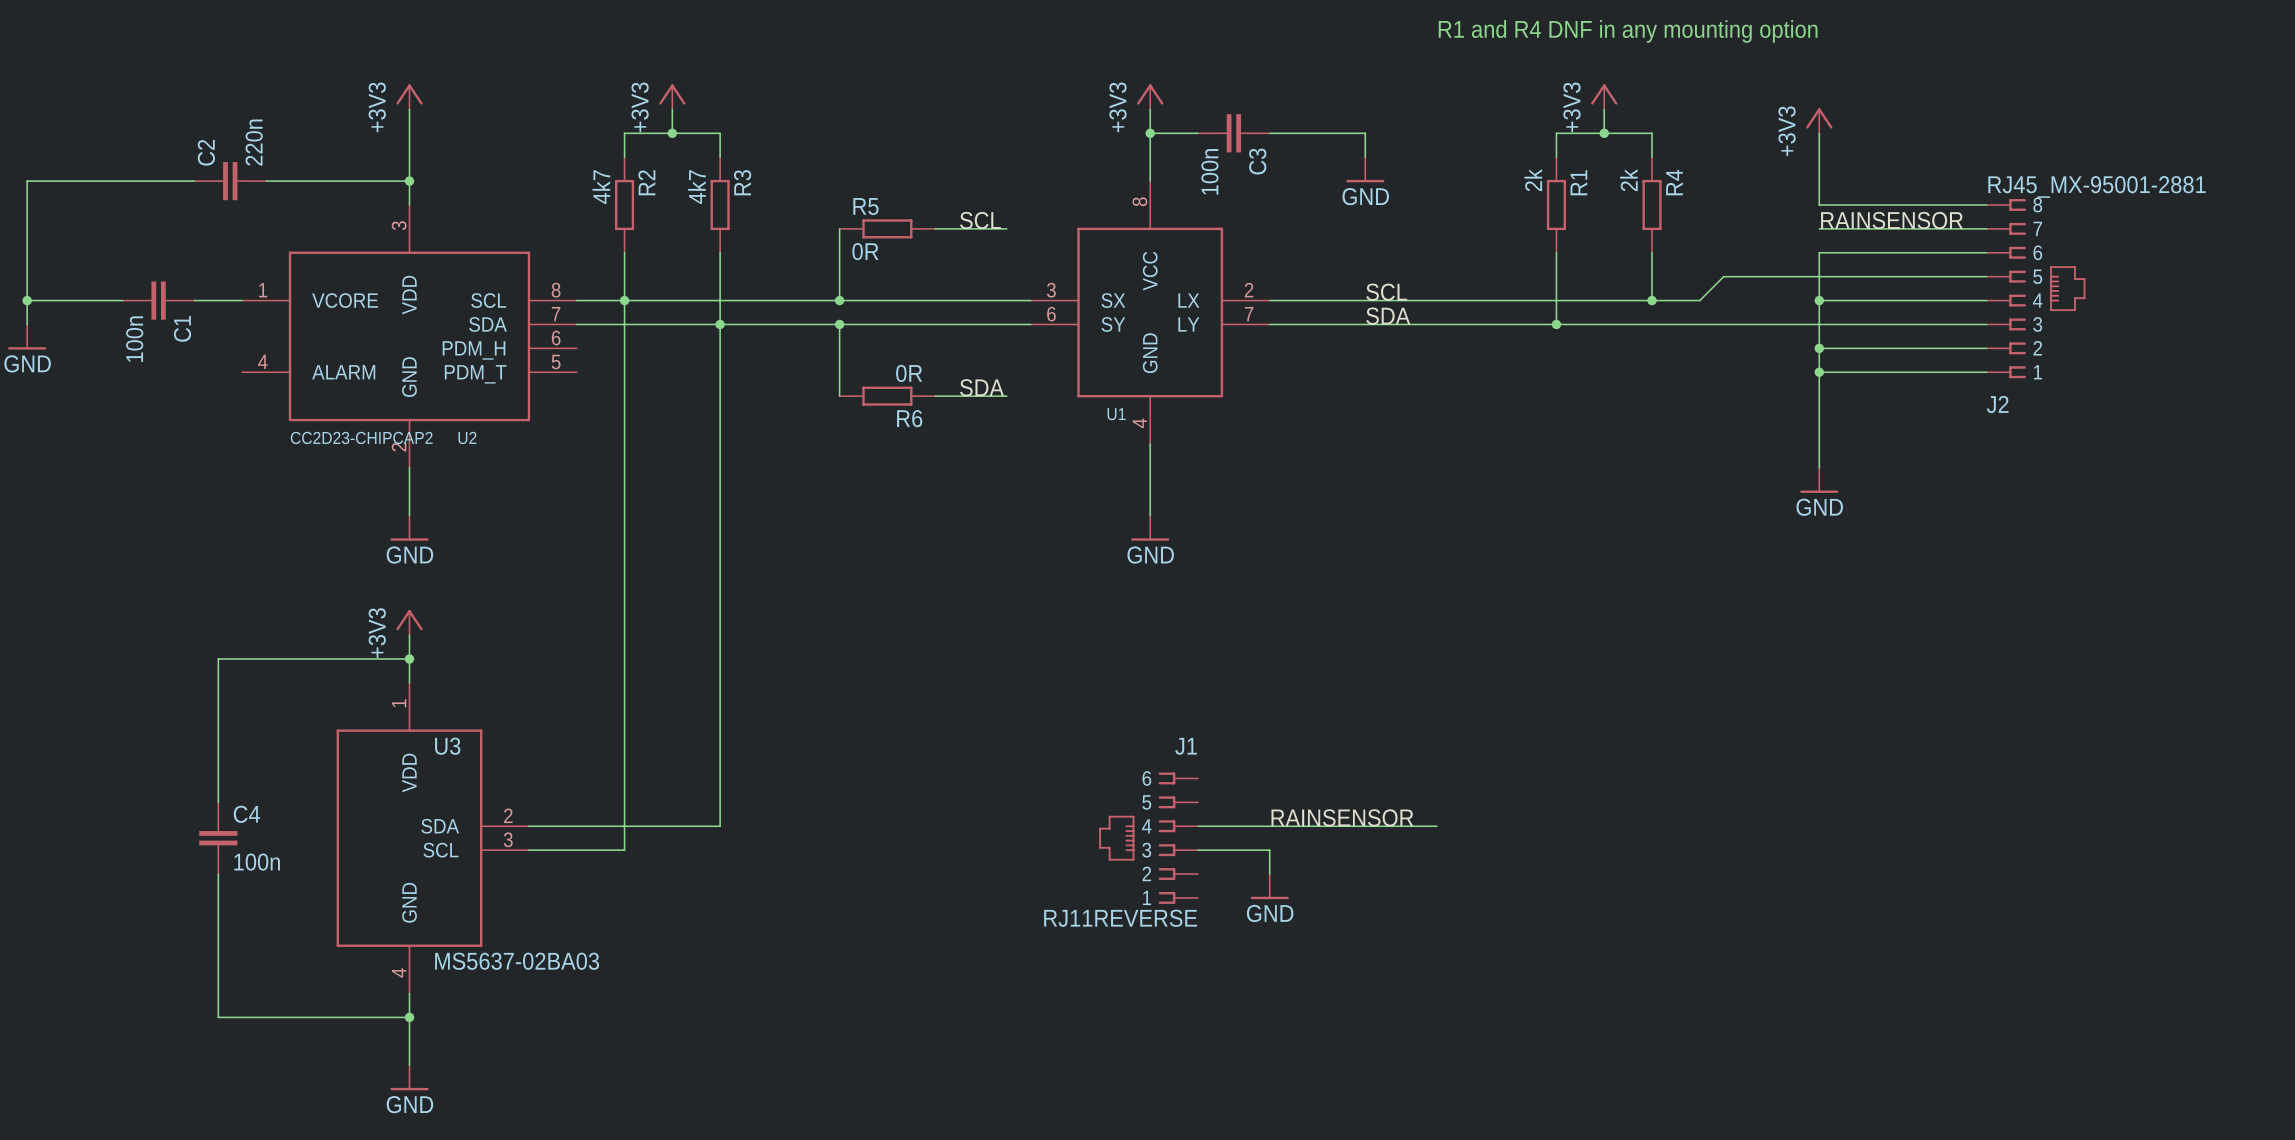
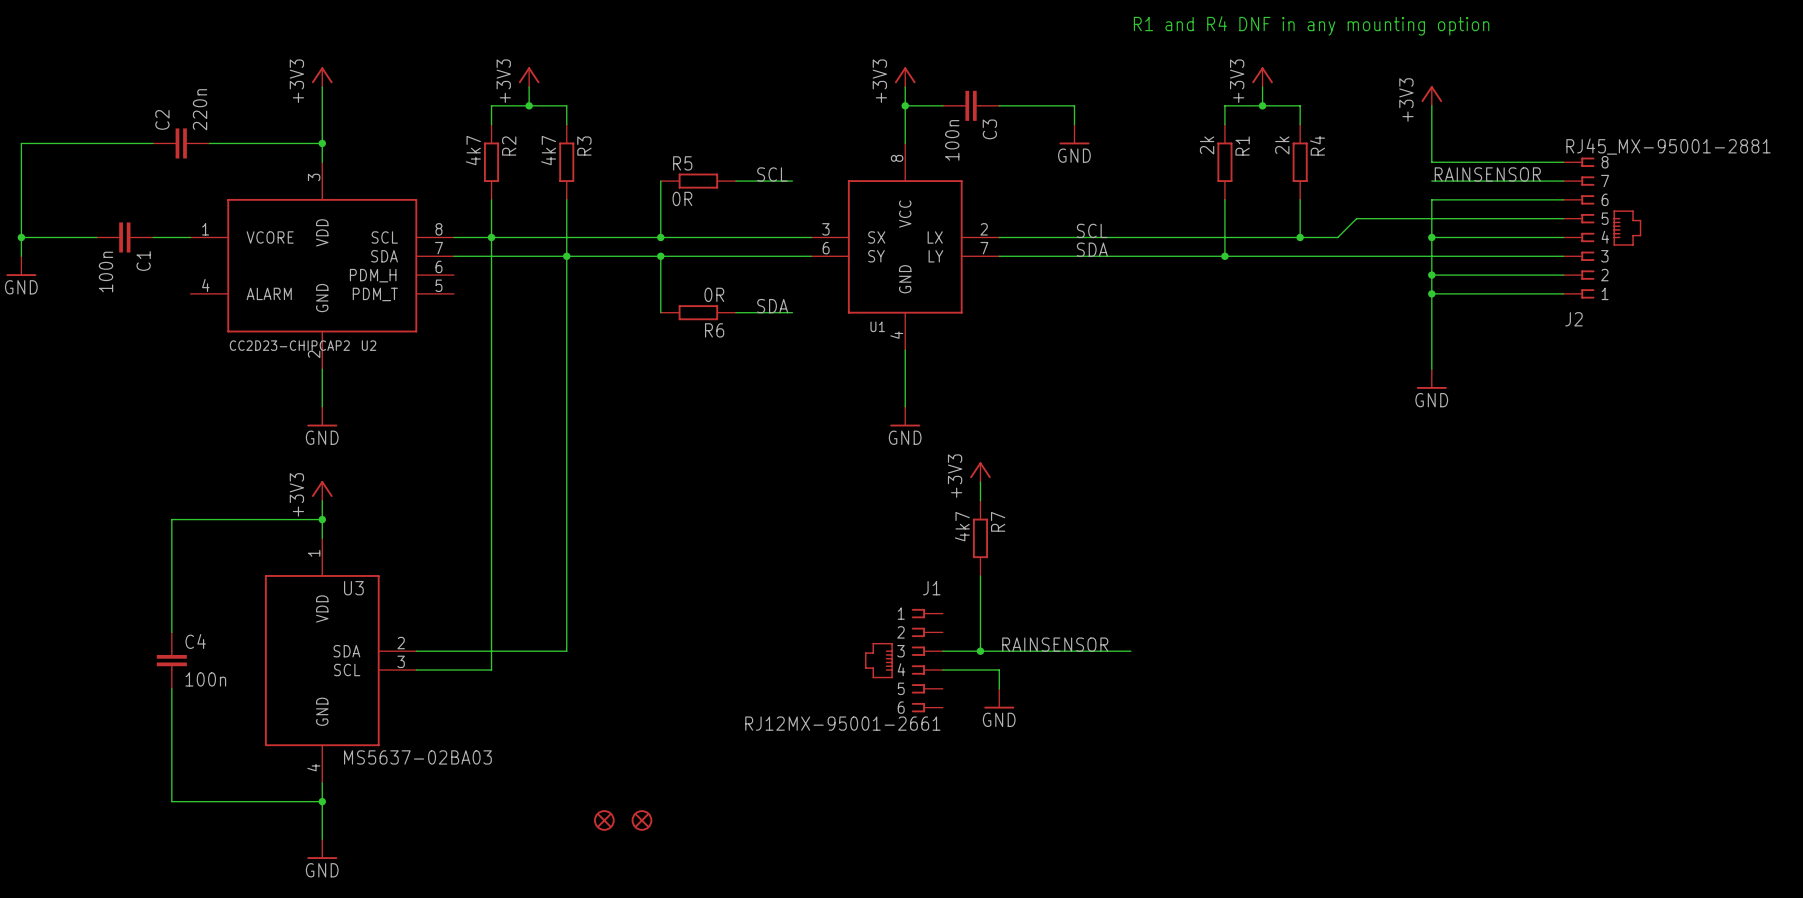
power symbol: none -> +3V3 (980, 472)
wire: none -> (980, 481) (980, 500)
R7: none -> 4k7 (980, 538)
wire: none -> (980, 575) (980, 651)
junction: none -> (980, 651)
J1 flip: as is (1137, 838) -> up-down (895, 660)
J1 value: RJ11REVERSE (1120, 918) -> RJ12MX-95001-2661 (842, 723)
part: none -> (604, 820)
part: none -> (641, 820)

